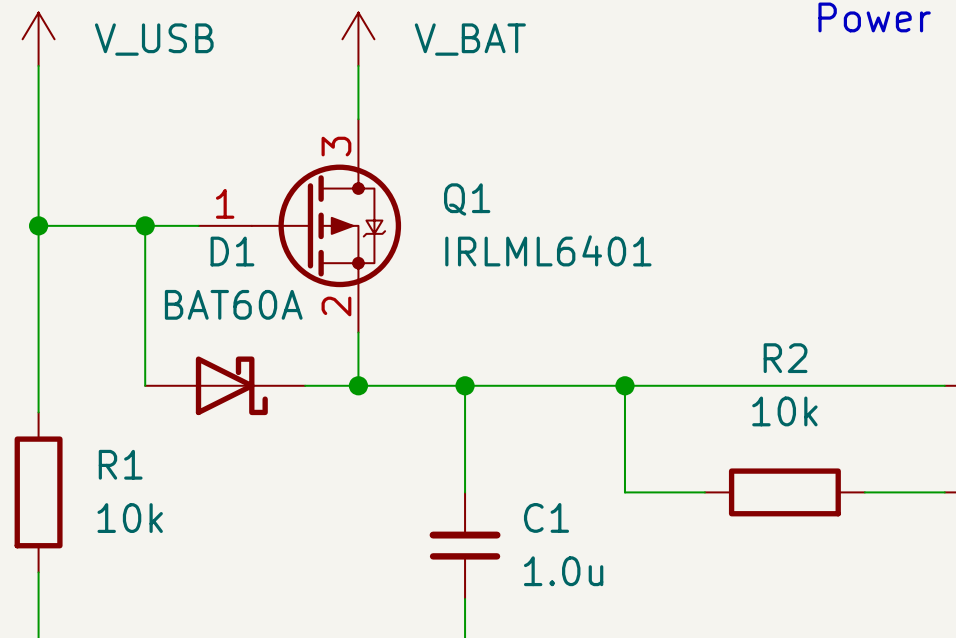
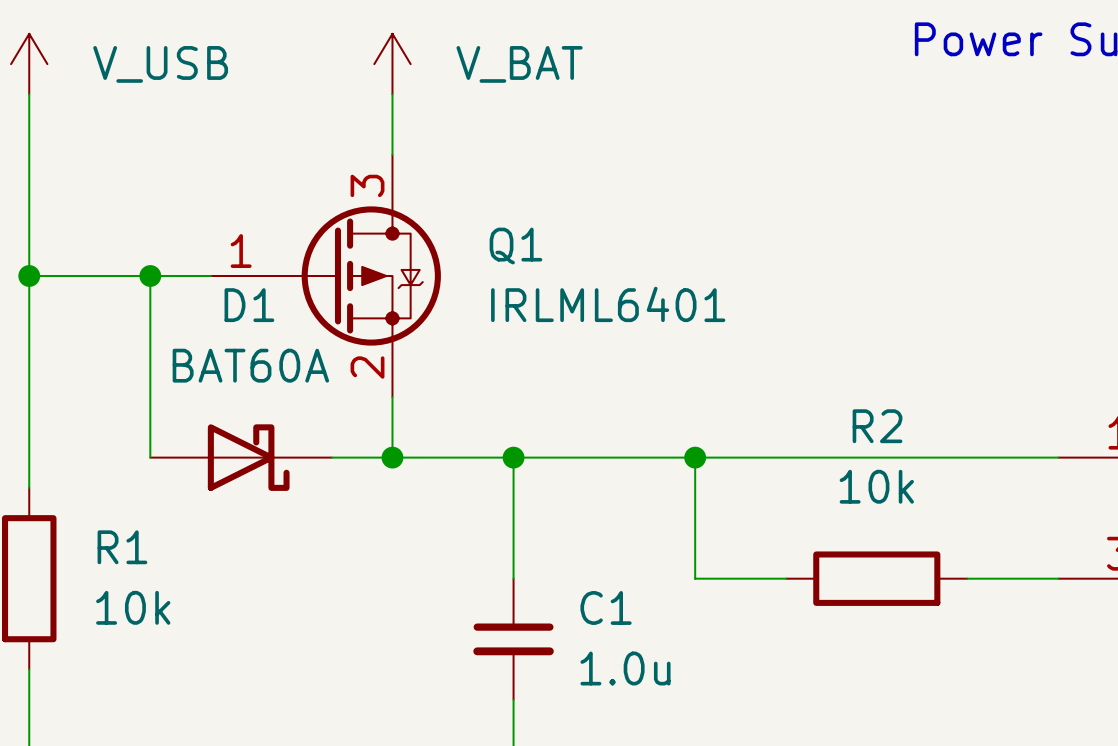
C1 rotation: 0° (465, 545) -> 180° (513, 639)

